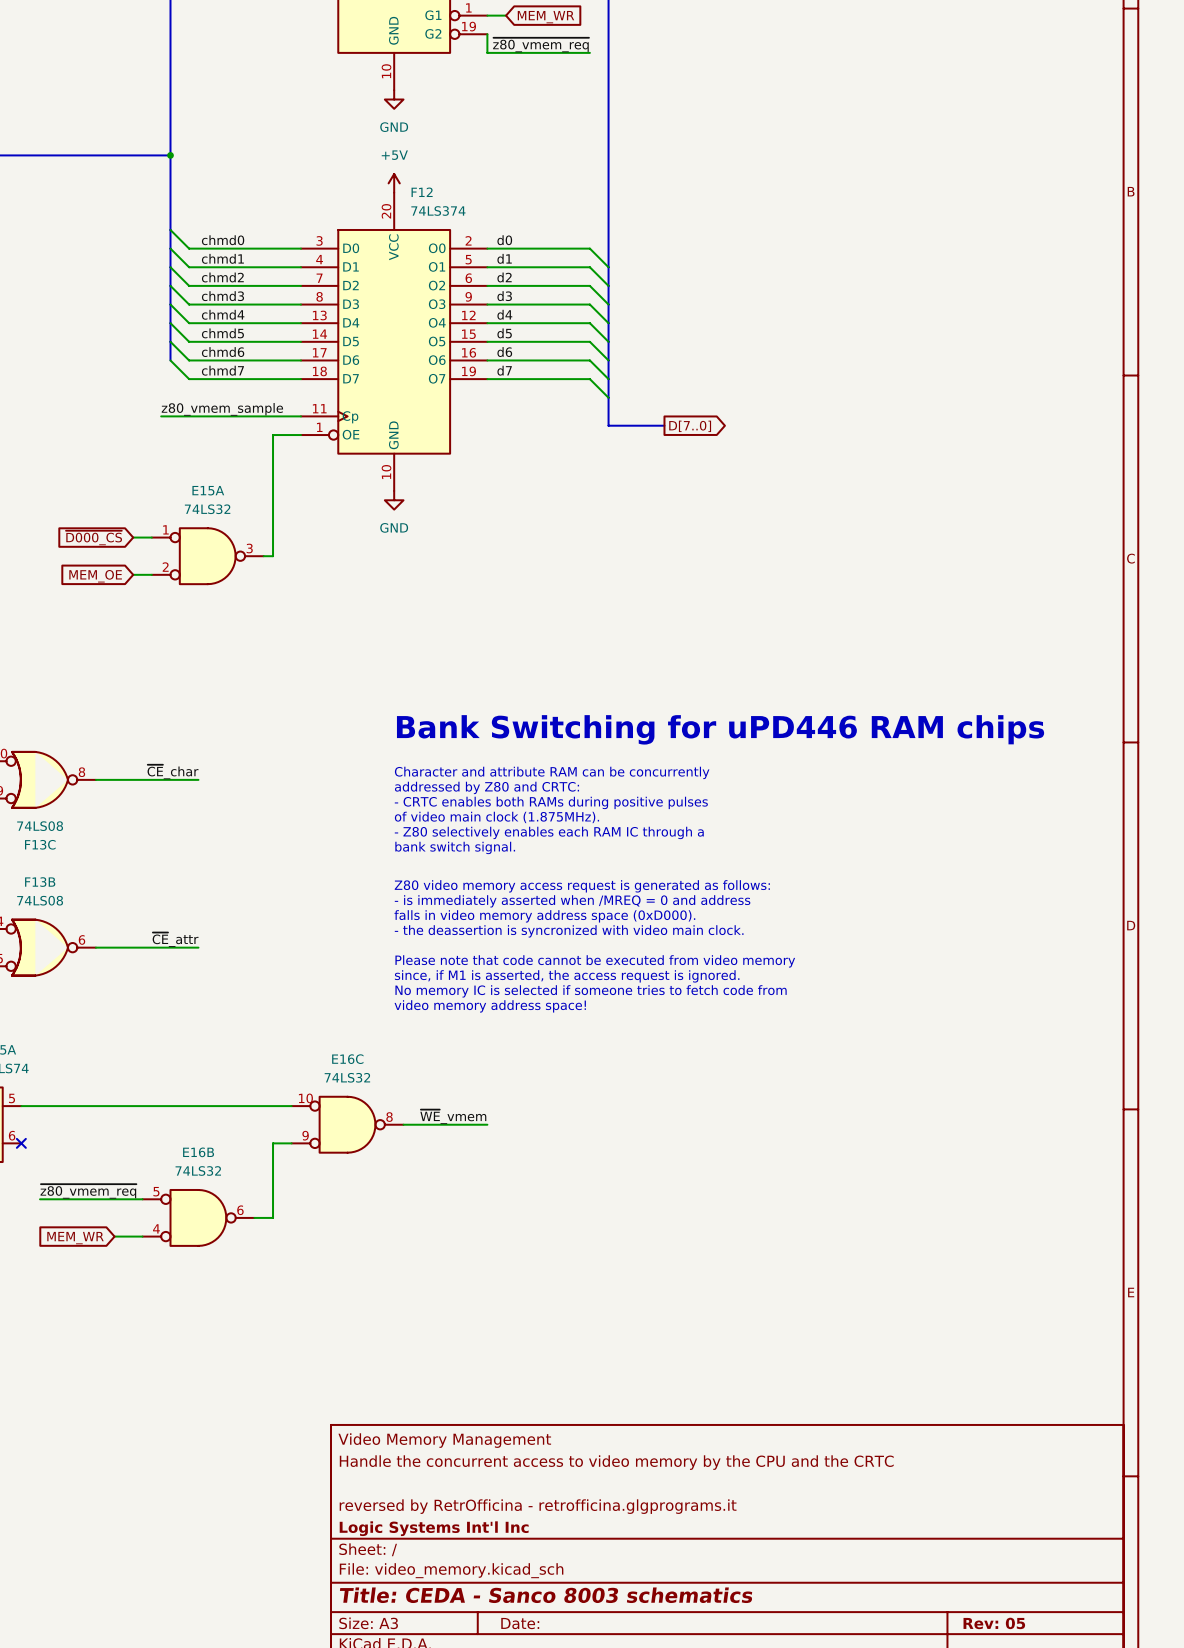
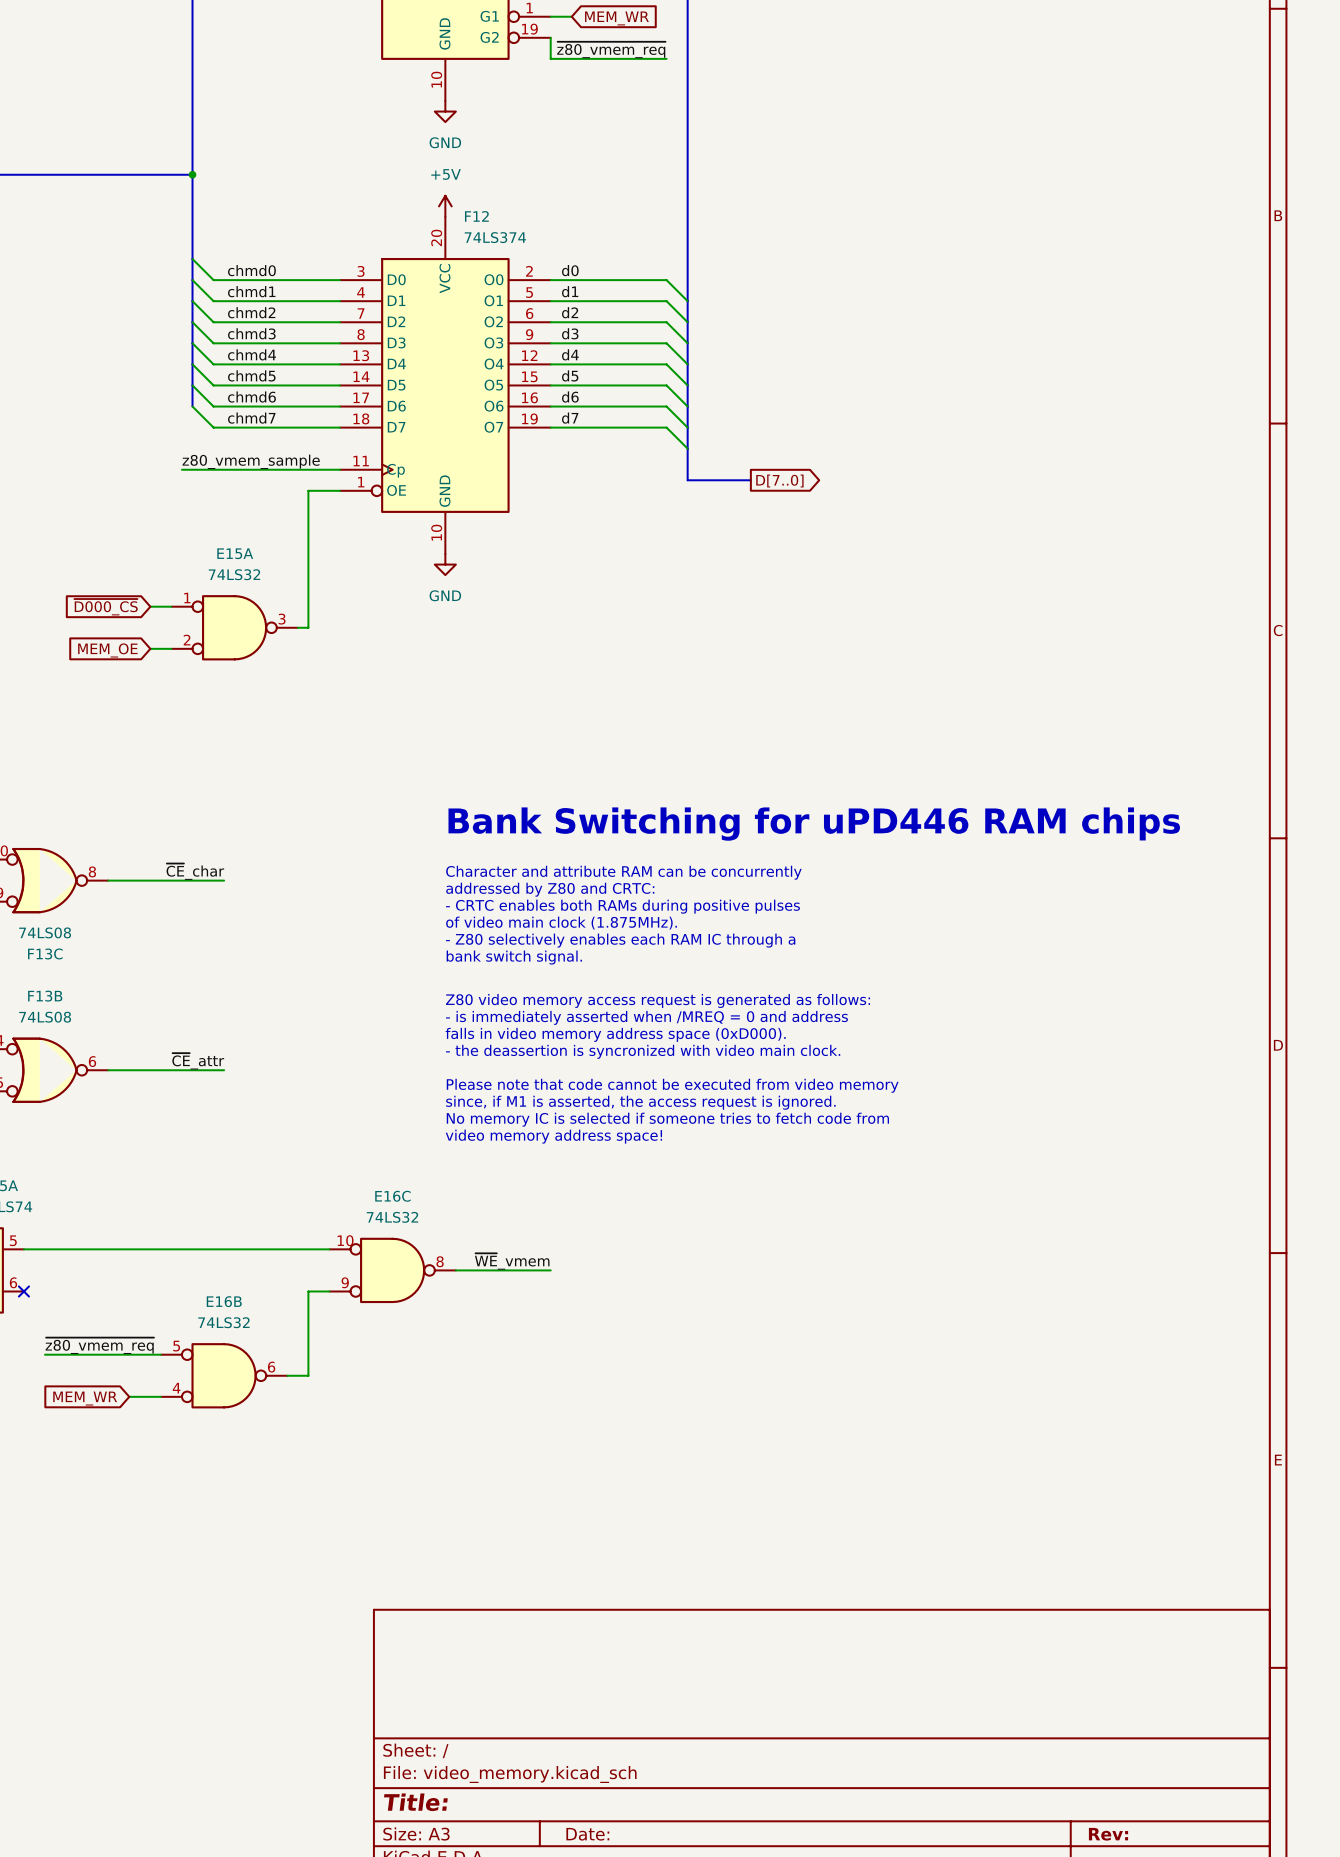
title block: Video Memory Management (444, 1440) -> none
title block: Handle the concurrent access to video memory by the CPU and the CRTC (616, 1462) -> none
title block: reversed by RetrOfficina - retrofficina.glgprograms.it (538, 1506) -> none
title block: Logic Systems Int'l Inc (434, 1528) -> none
title block: Title: CEDA - Sanco 8003 schematics (546, 1595) -> Title: (415, 1802)
title block: Rev: 05 (994, 1623) -> Rev: (1108, 1834)

